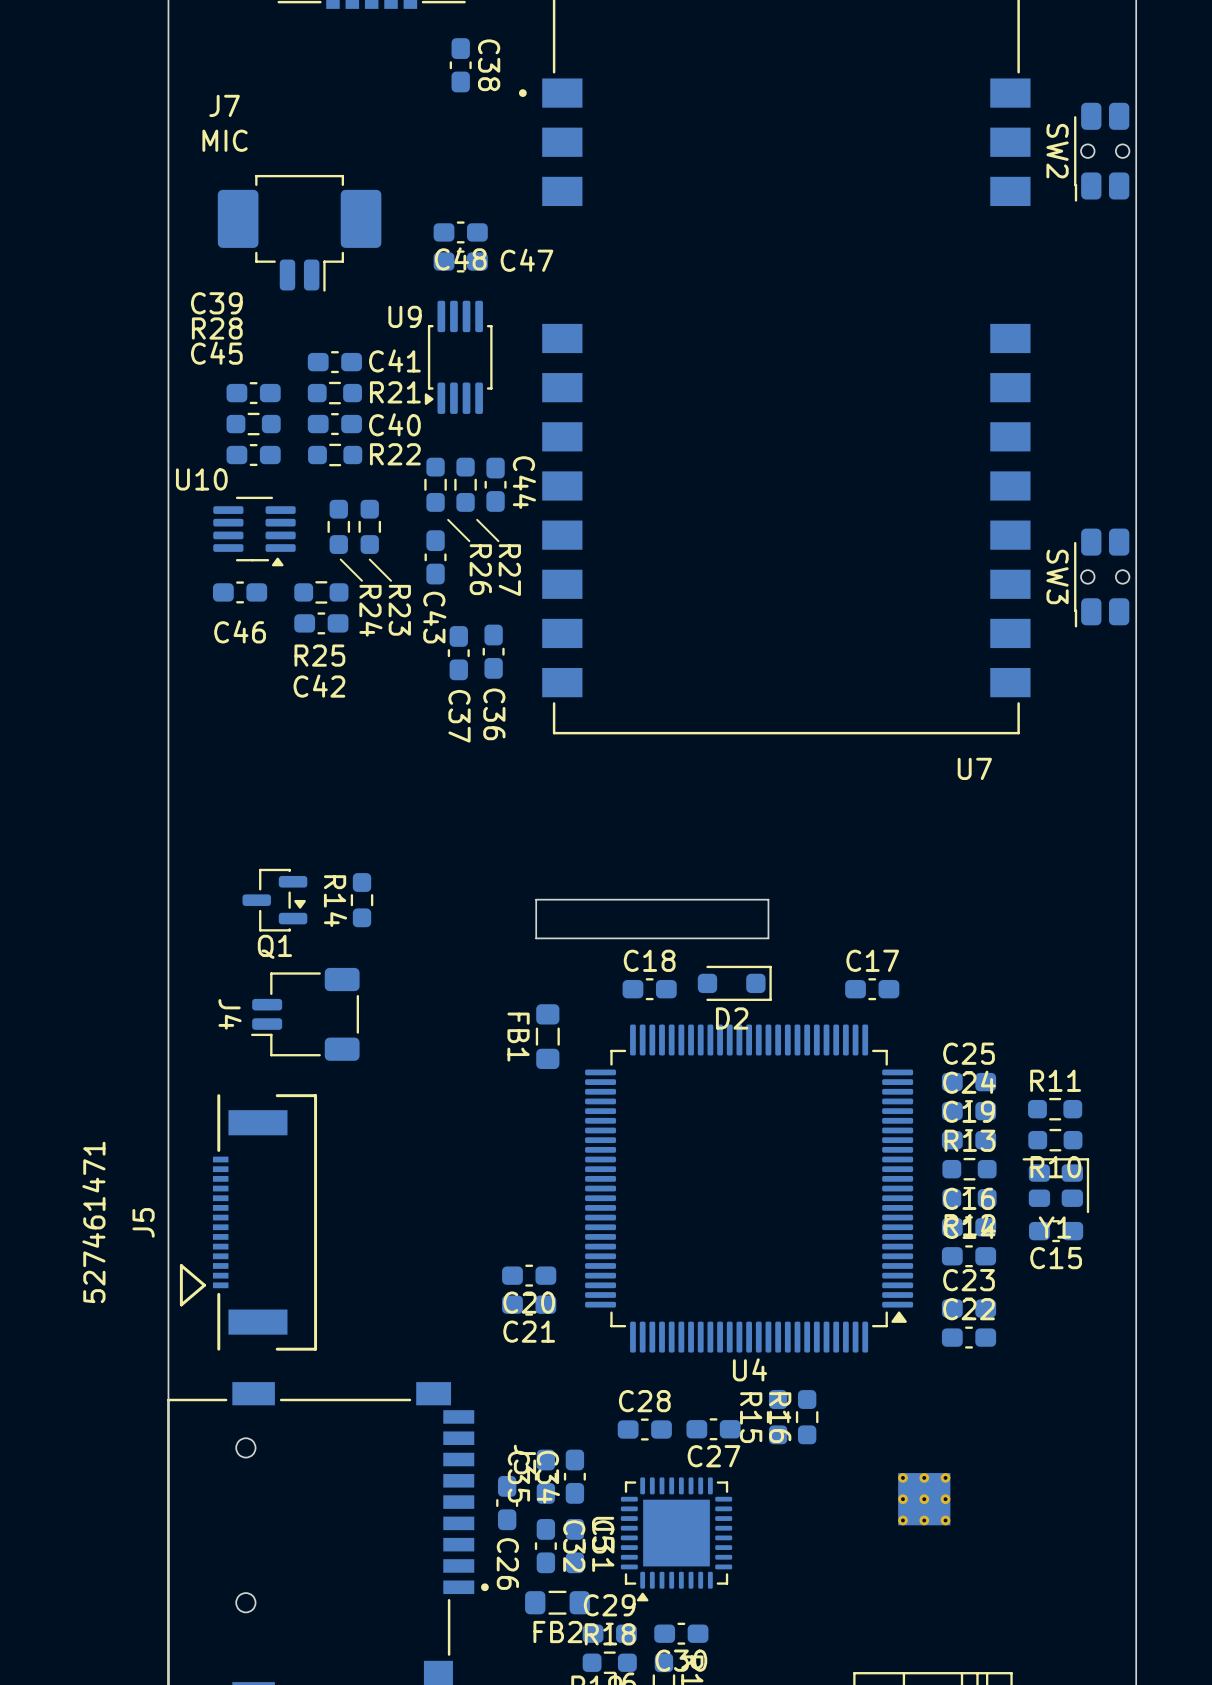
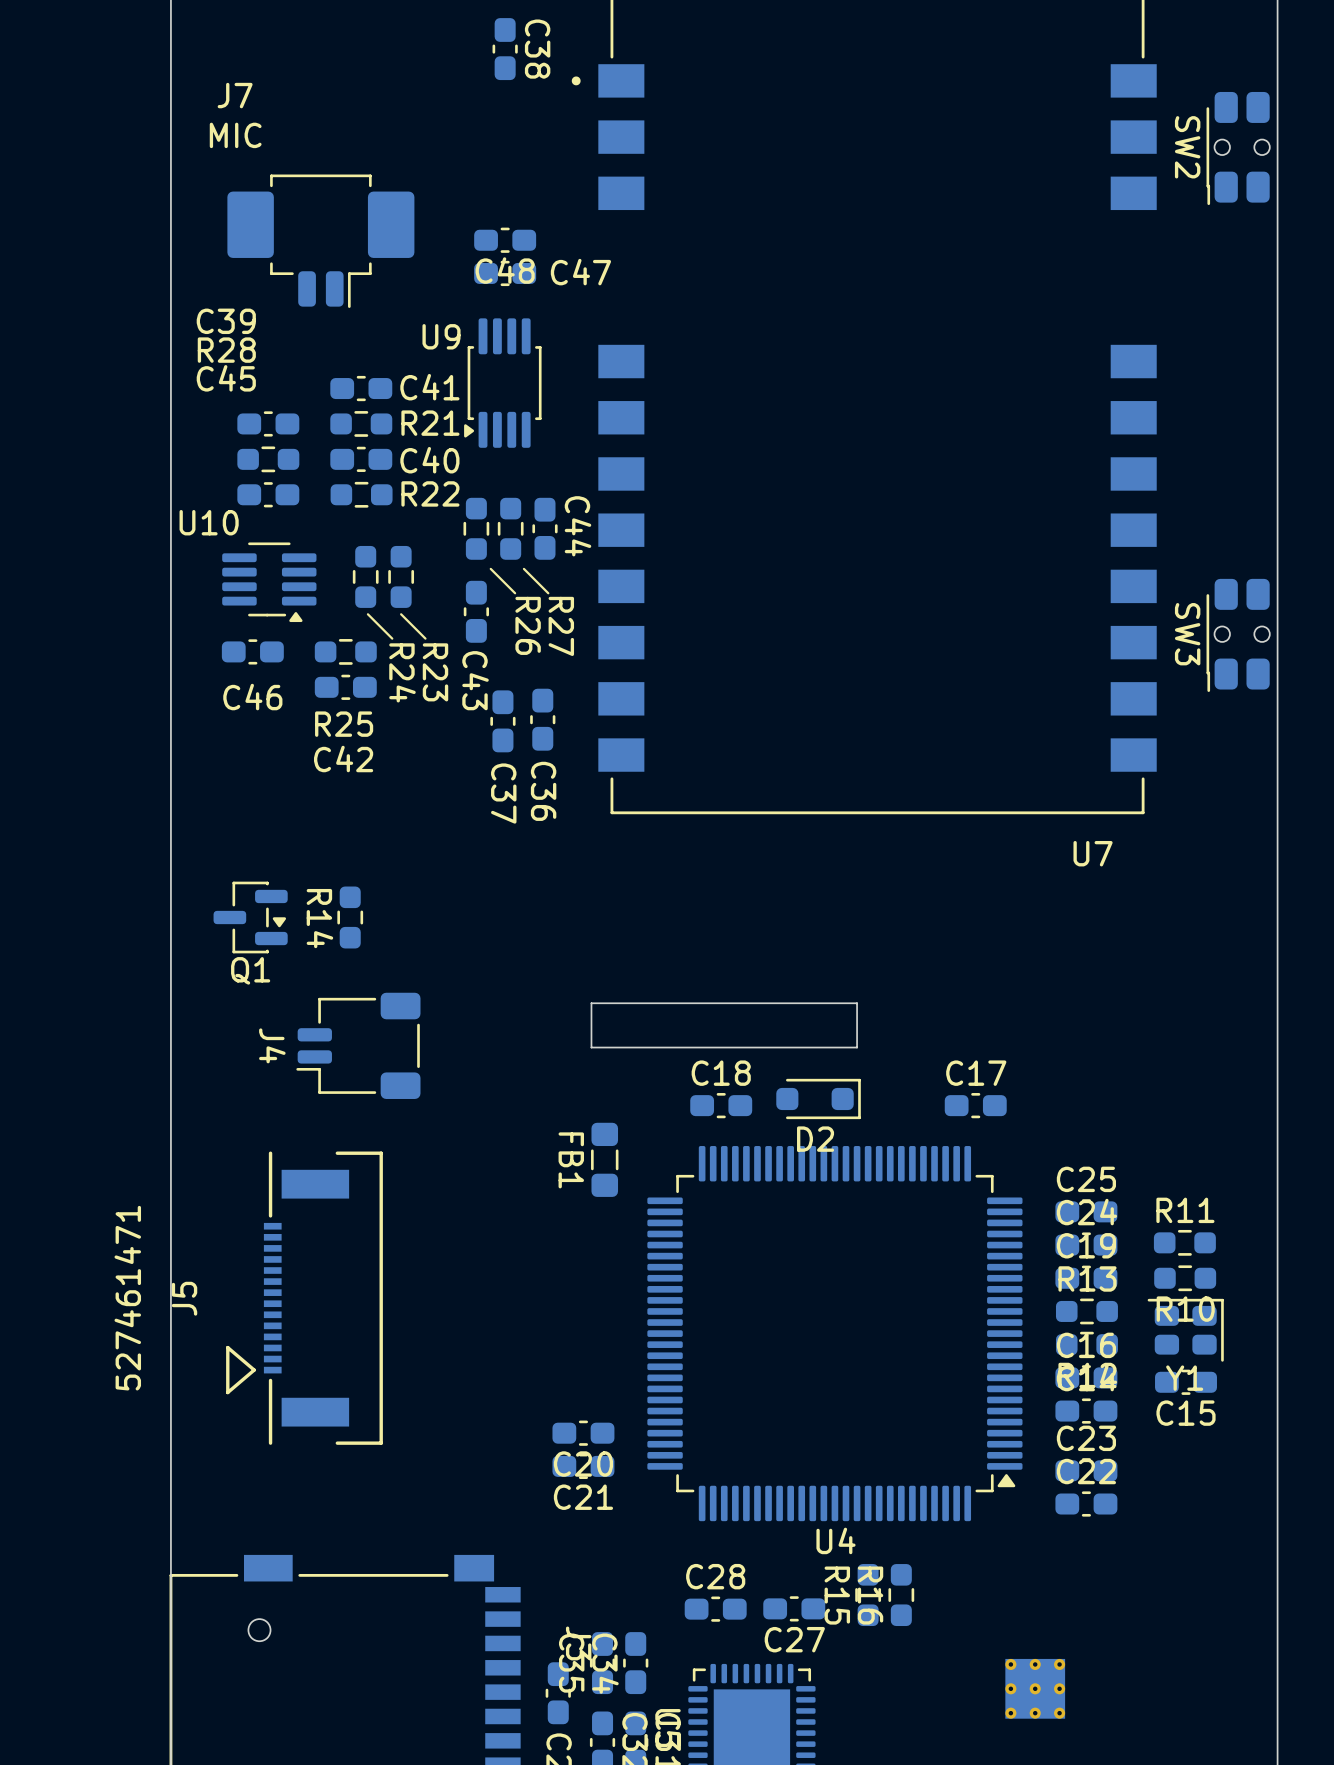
Q1 position: (274, 900) -> (250, 917)
R14 position: (362, 900) -> (350, 917)
J4 position: (305, 1014) -> (358, 1045)
J5 position: (248, 1222) -> (304, 1298)

